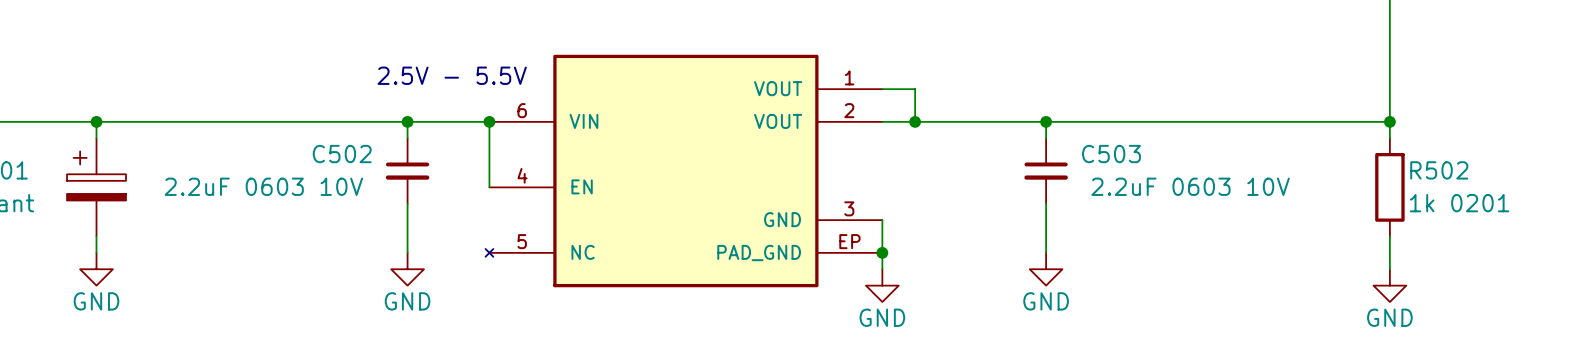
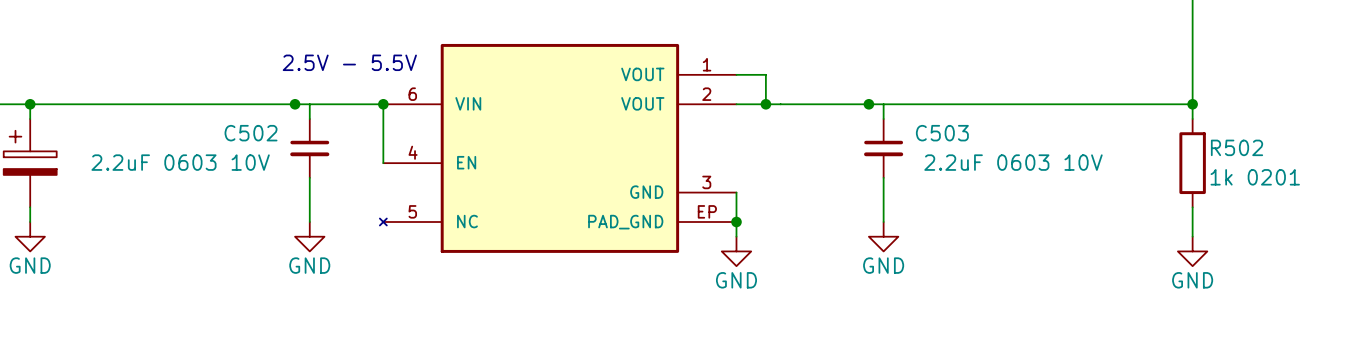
junction position: (407, 121) -> (295, 104)
junction position: (1046, 121) -> (868, 104)

